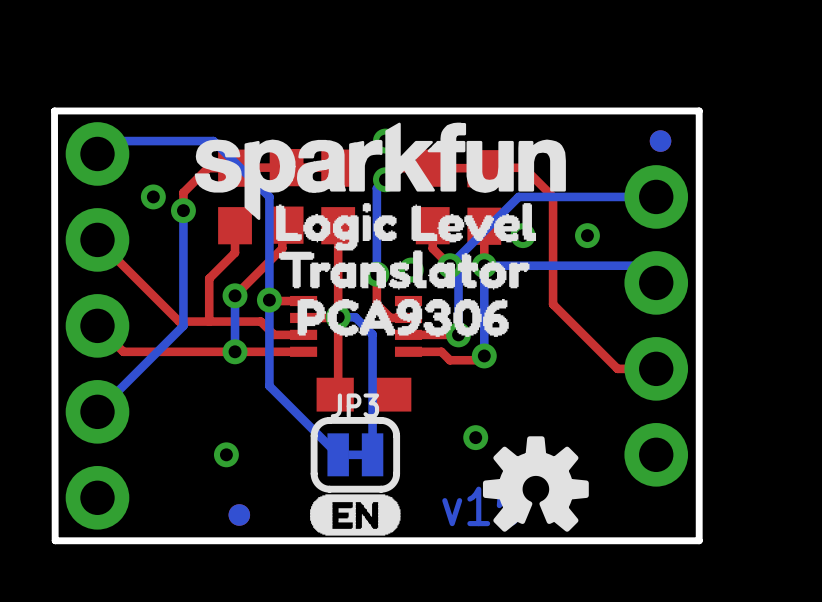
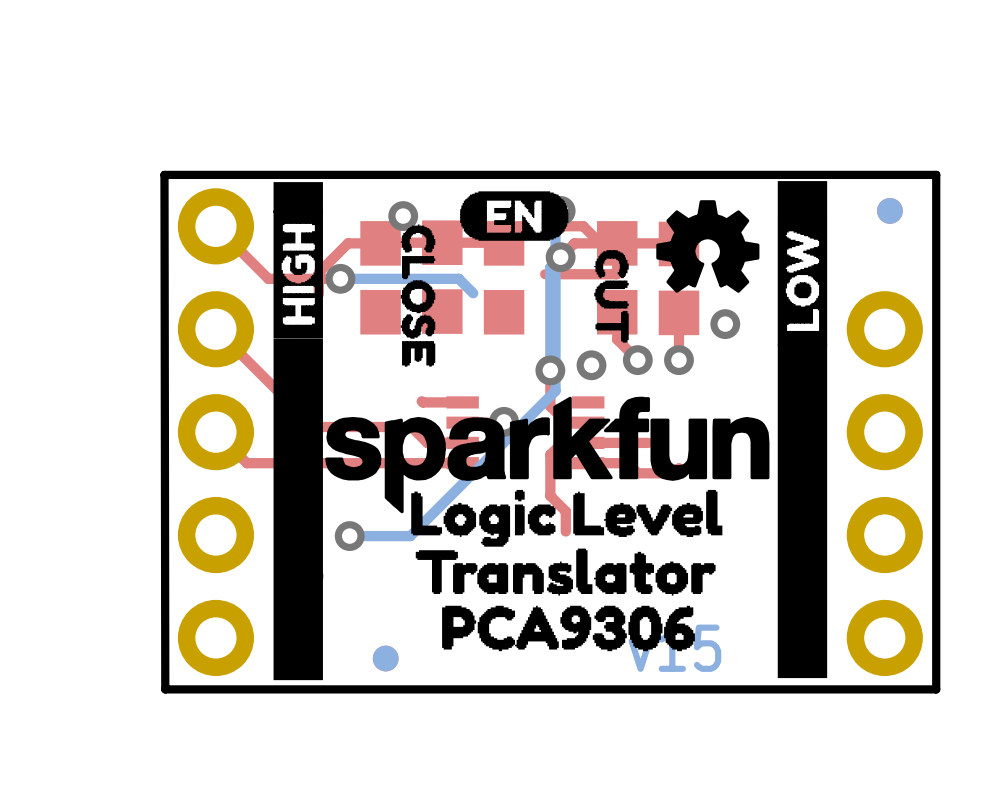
drawing: none -> [273, 182, 323, 681]
drawing: none -> [594, 181, 828, 679]
via: none -> (403, 216)
drawing: none -> [400, 224, 436, 367]
top track: none -> (215, 226) (268, 278) (340, 278)
bottom track: (97, 153) (110, 141) (213, 141) (269, 196) (269, 386) (338, 454) -> none
top track: none -> (555, 226) (583, 226) (617, 260) (617, 273) (545, 274)
bottom track: none -> (555, 226) (555, 390) (410, 536) (349, 536)
top track: (485, 167) (523, 167) (553, 196) (553, 304) (617, 368) (656, 368) -> none
drawing position: (380, 171) -> (547, 454)
via: (153, 196) -> none
bottom track: (656, 196) (518, 196) (449, 265) (458, 274) (458, 334) -> none
bottom track: none -> (340, 278) (458, 278) (473, 293)
bottom track: (183, 210) (183, 325) (97, 411) -> none
via position: (183, 210) -> (340, 278)
top track: (235, 225) (235, 252) (209, 278) (209, 321) -> none
top track: (286, 225) (282, 229) (282, 248) (235, 295) -> none
top track: (338, 225) (338, 391) (335, 394) -> none
drawing position: (406, 226) -> (566, 518)
via: (587, 235) -> none
drawing position: (404, 270) -> (565, 572)
bottom track: (656, 282) (639, 265) (484, 265) (484, 355) -> none
bottom track: (235, 295) (235, 351) -> none
via: (235, 295) -> none
via: (269, 300) -> none
bottom track: (338, 317) (355, 317) (372, 334) (372, 454) -> none
drawing position: (403, 317) -> (568, 628)
part position: (656, 325) -> (884, 483)
top track: none -> (588, 442) (562, 442) (550, 454) (550, 495) (565, 511) (565, 531)
via: (458, 334) -> none
via: (235, 351) -> none
via: (484, 355) -> none
part: (363, 394) -> none
via: none -> (349, 536)
drawing: [482, 436, 589, 532] -> none
via: (475, 437) -> none
via: (226, 454) -> none
JP3: (355, 454) -> none
drawing position: (355, 514) -> (514, 216)

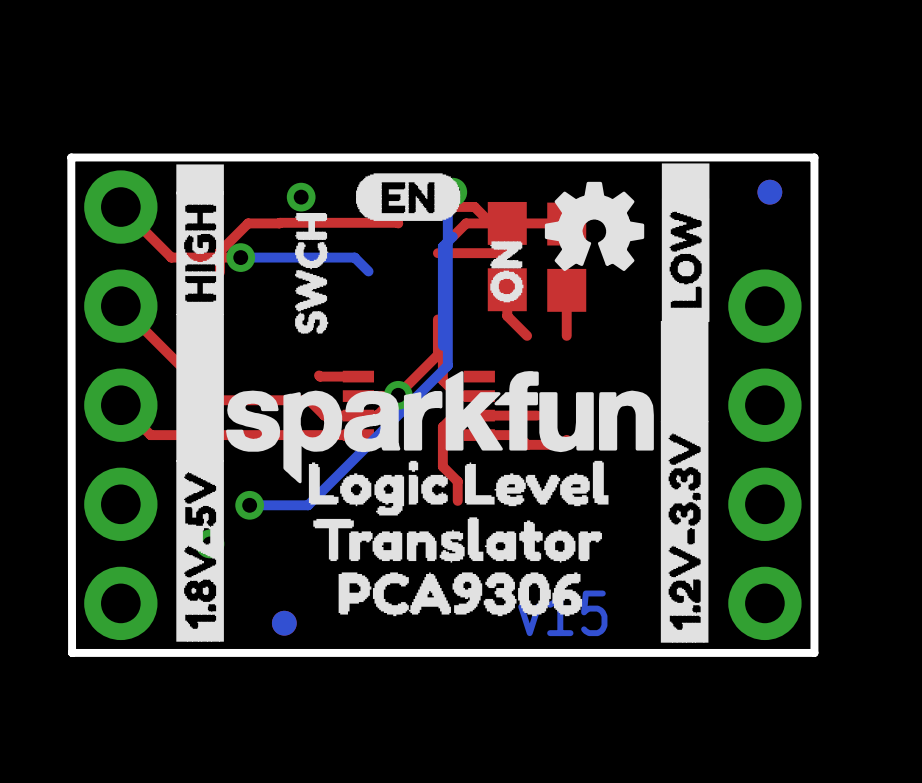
drawing shape: [400, 224, 436, 367] -> [295, 212, 329, 334]
drawing shape: [594, 250, 629, 343] -> [490, 241, 524, 303]
via: (560, 257) -> none
part: (380, 277) -> none
part: (442, 277) -> none
part: (504, 277) -> none
via: (725, 324) -> none
drawing: none -> [176, 314, 224, 642]
drawing: [273, 338, 323, 681] -> none
top track: none -> (437, 319) (437, 354) (377, 415) (358, 415)
drawing: none -> [660, 320, 709, 643]
drawing: [777, 344, 828, 679] -> none
via: (637, 360) -> none
via: (678, 360) -> none
via: (591, 365) -> none
via: (550, 370) -> none

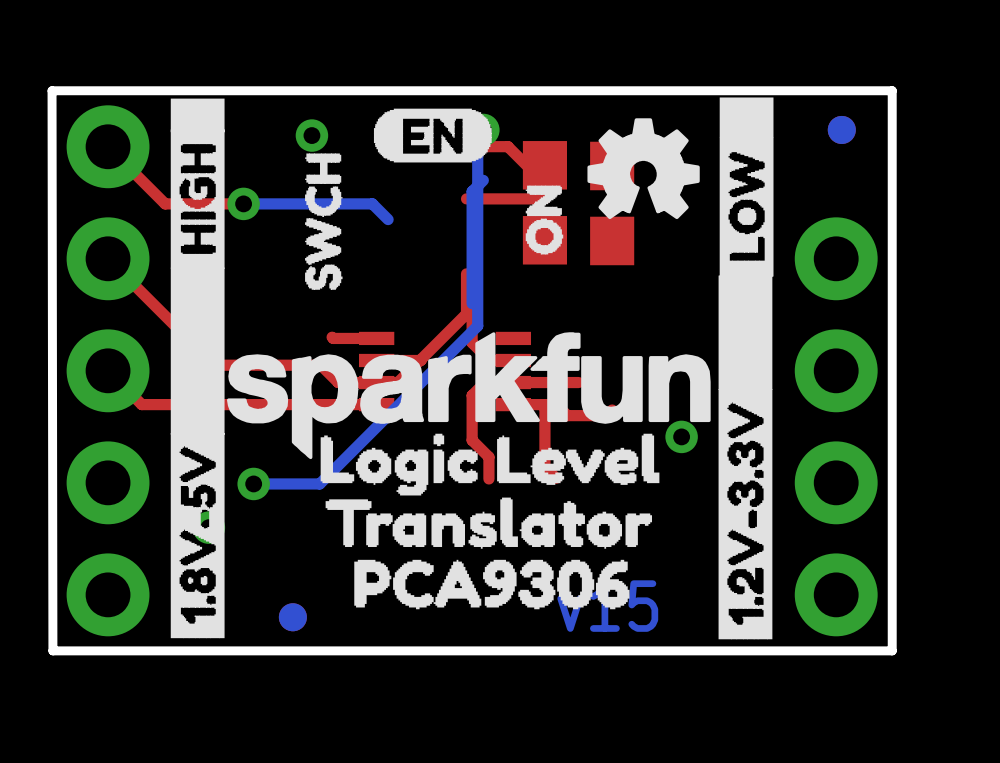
top track: (568, 221) (566, 224) (466, 223) (452, 236) -> none
top track: (398, 223) (248, 223) (219, 251) (219, 272) -> none
top track: (507, 289) (507, 316) (527, 335) -> none
top track: (566, 290) (566, 335) -> none
via: (398, 395) -> none
top track: none -> (544, 404) (544, 467) (556, 478)
via: none -> (681, 436)

